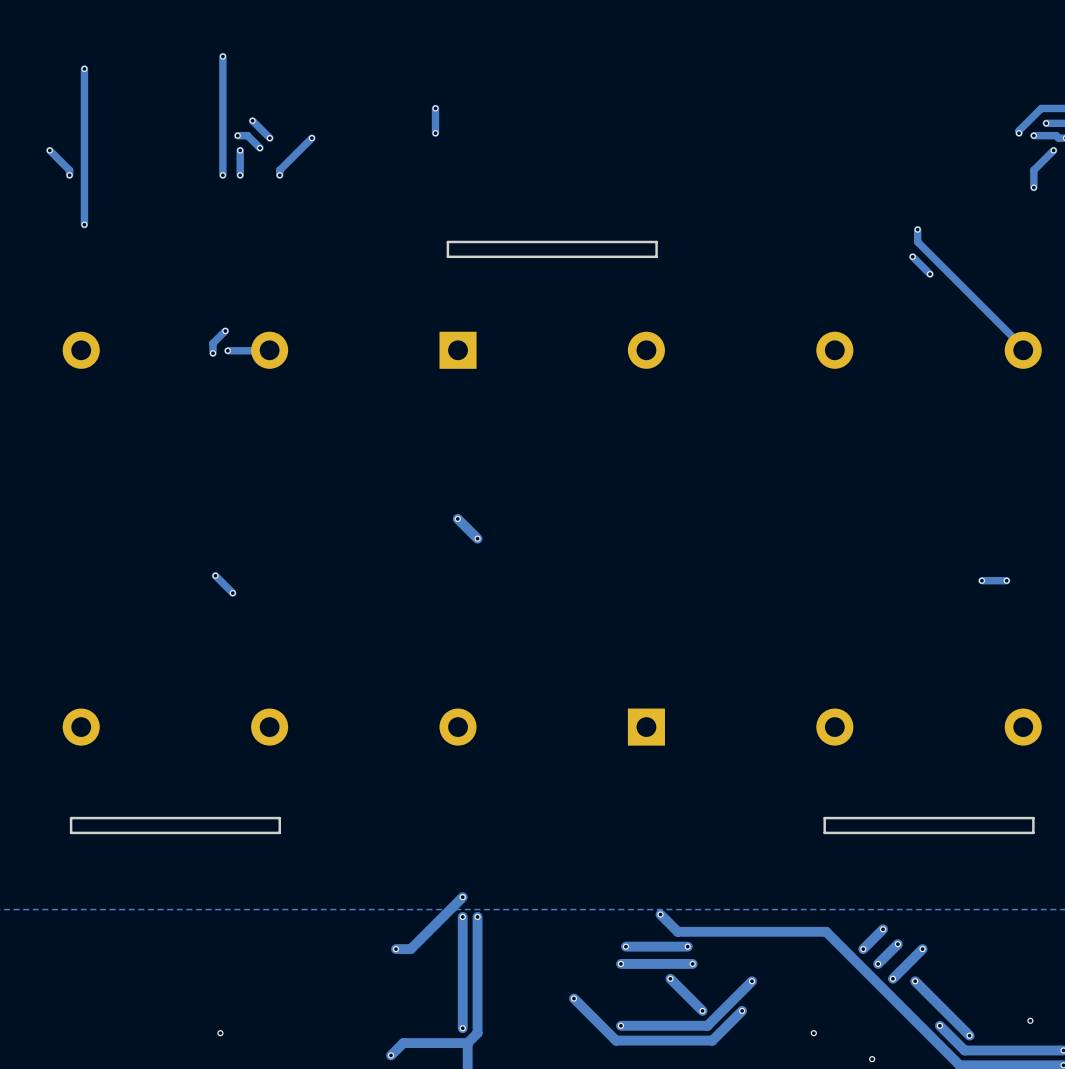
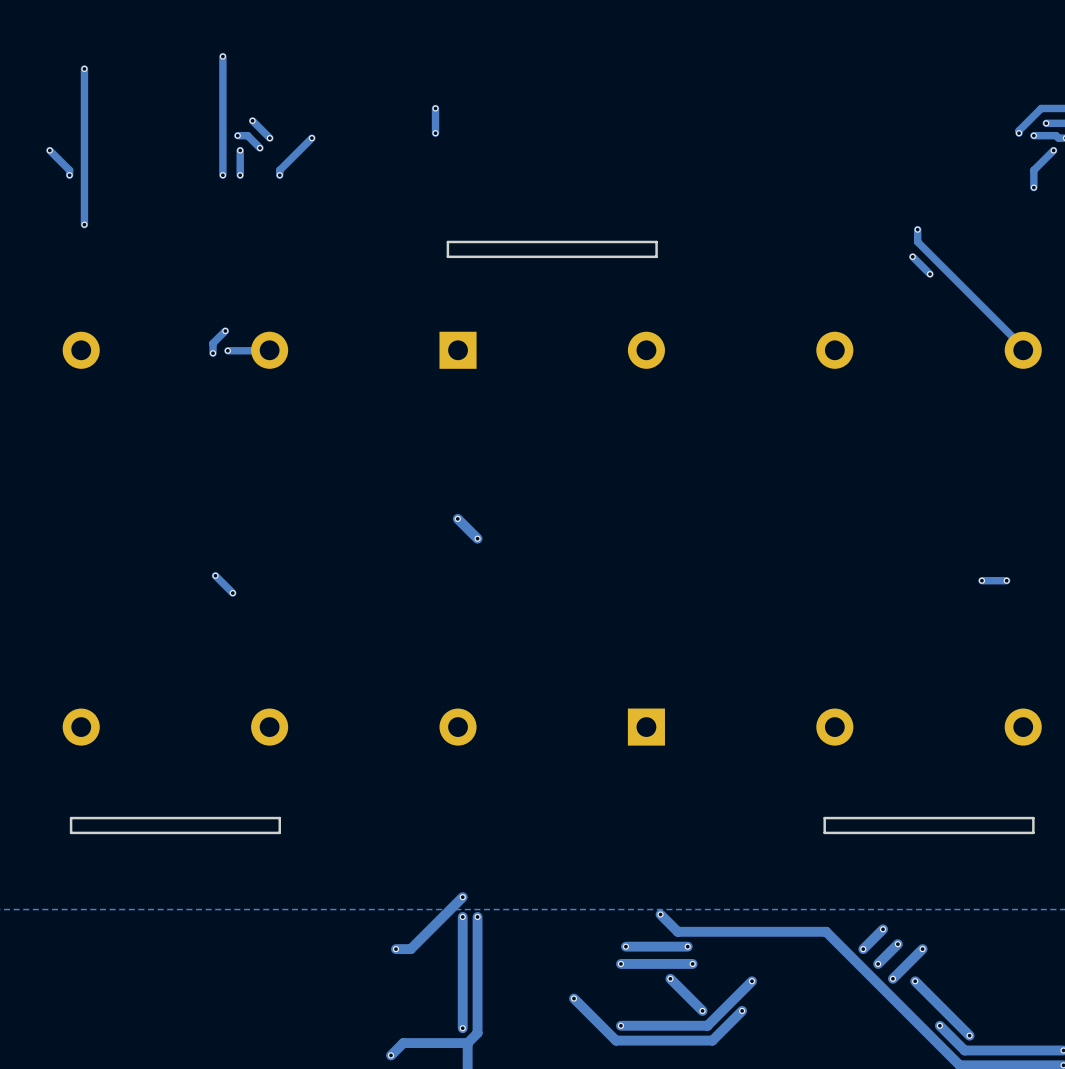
via: (1030, 1020) -> none
via: (220, 1033) -> none
via: (813, 1033) -> none
via: (872, 1059) -> none

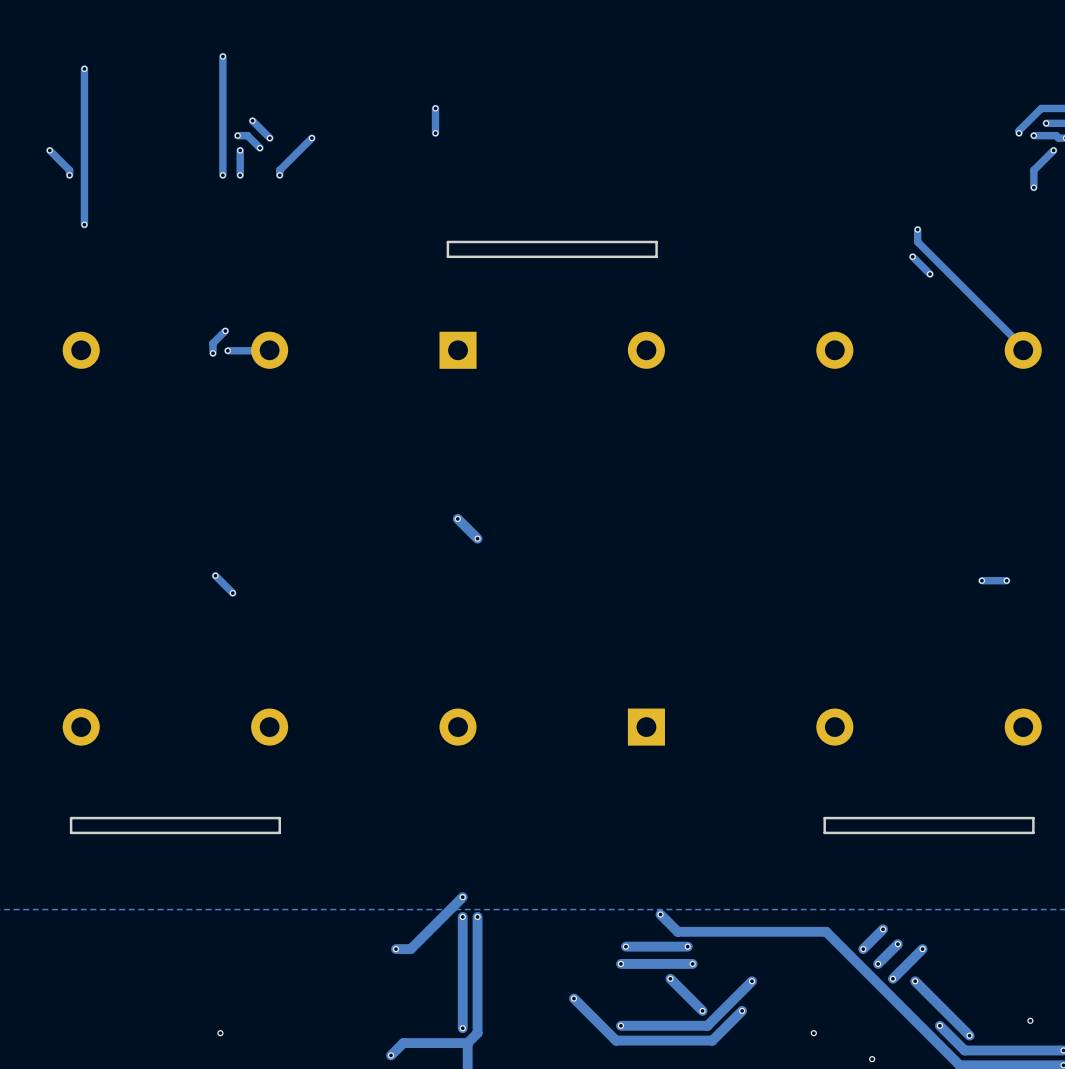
via: none -> (1030, 1020)
via: none -> (220, 1033)
via: none -> (813, 1033)
via: none -> (872, 1059)

